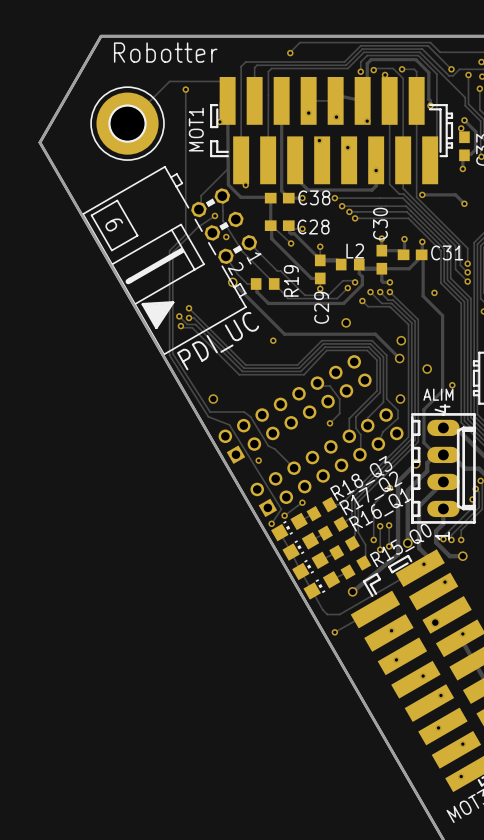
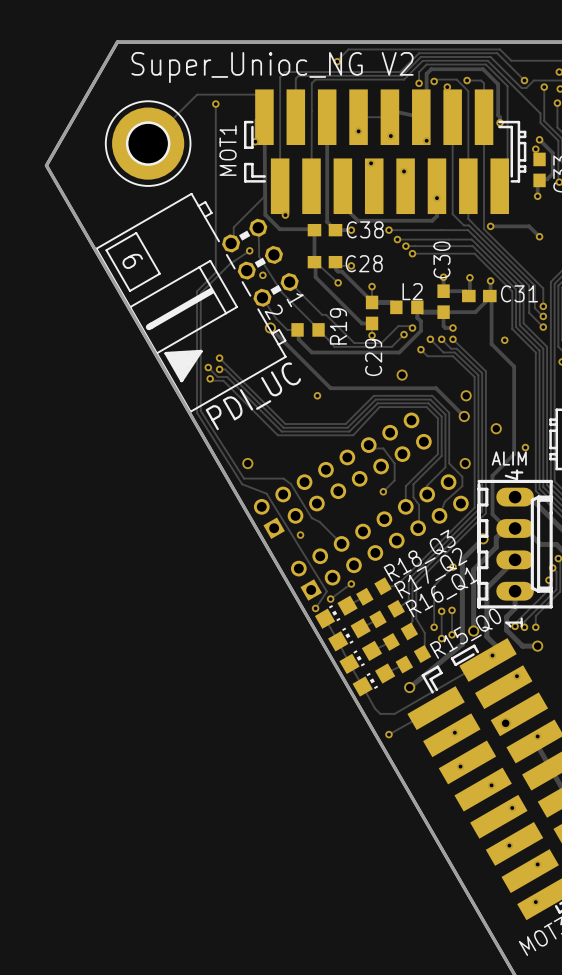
text: Robotter (165, 52) -> Super_Unioc_NG V2 (272, 67)

